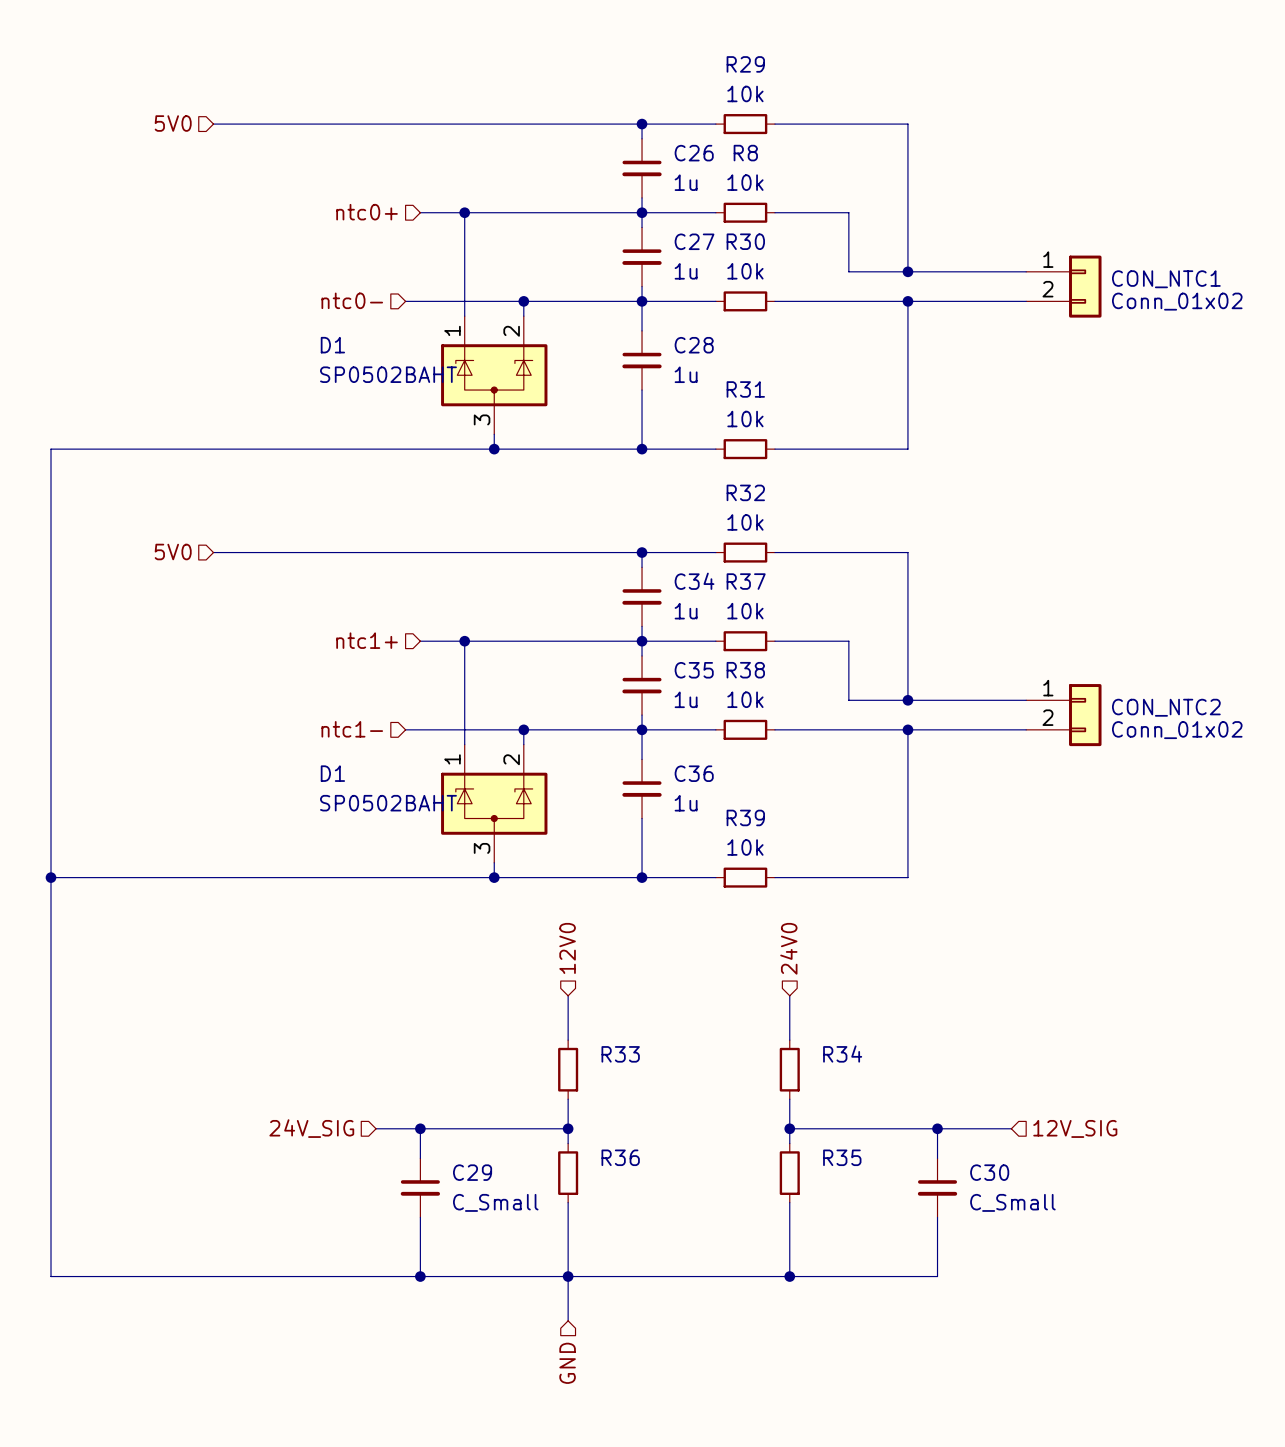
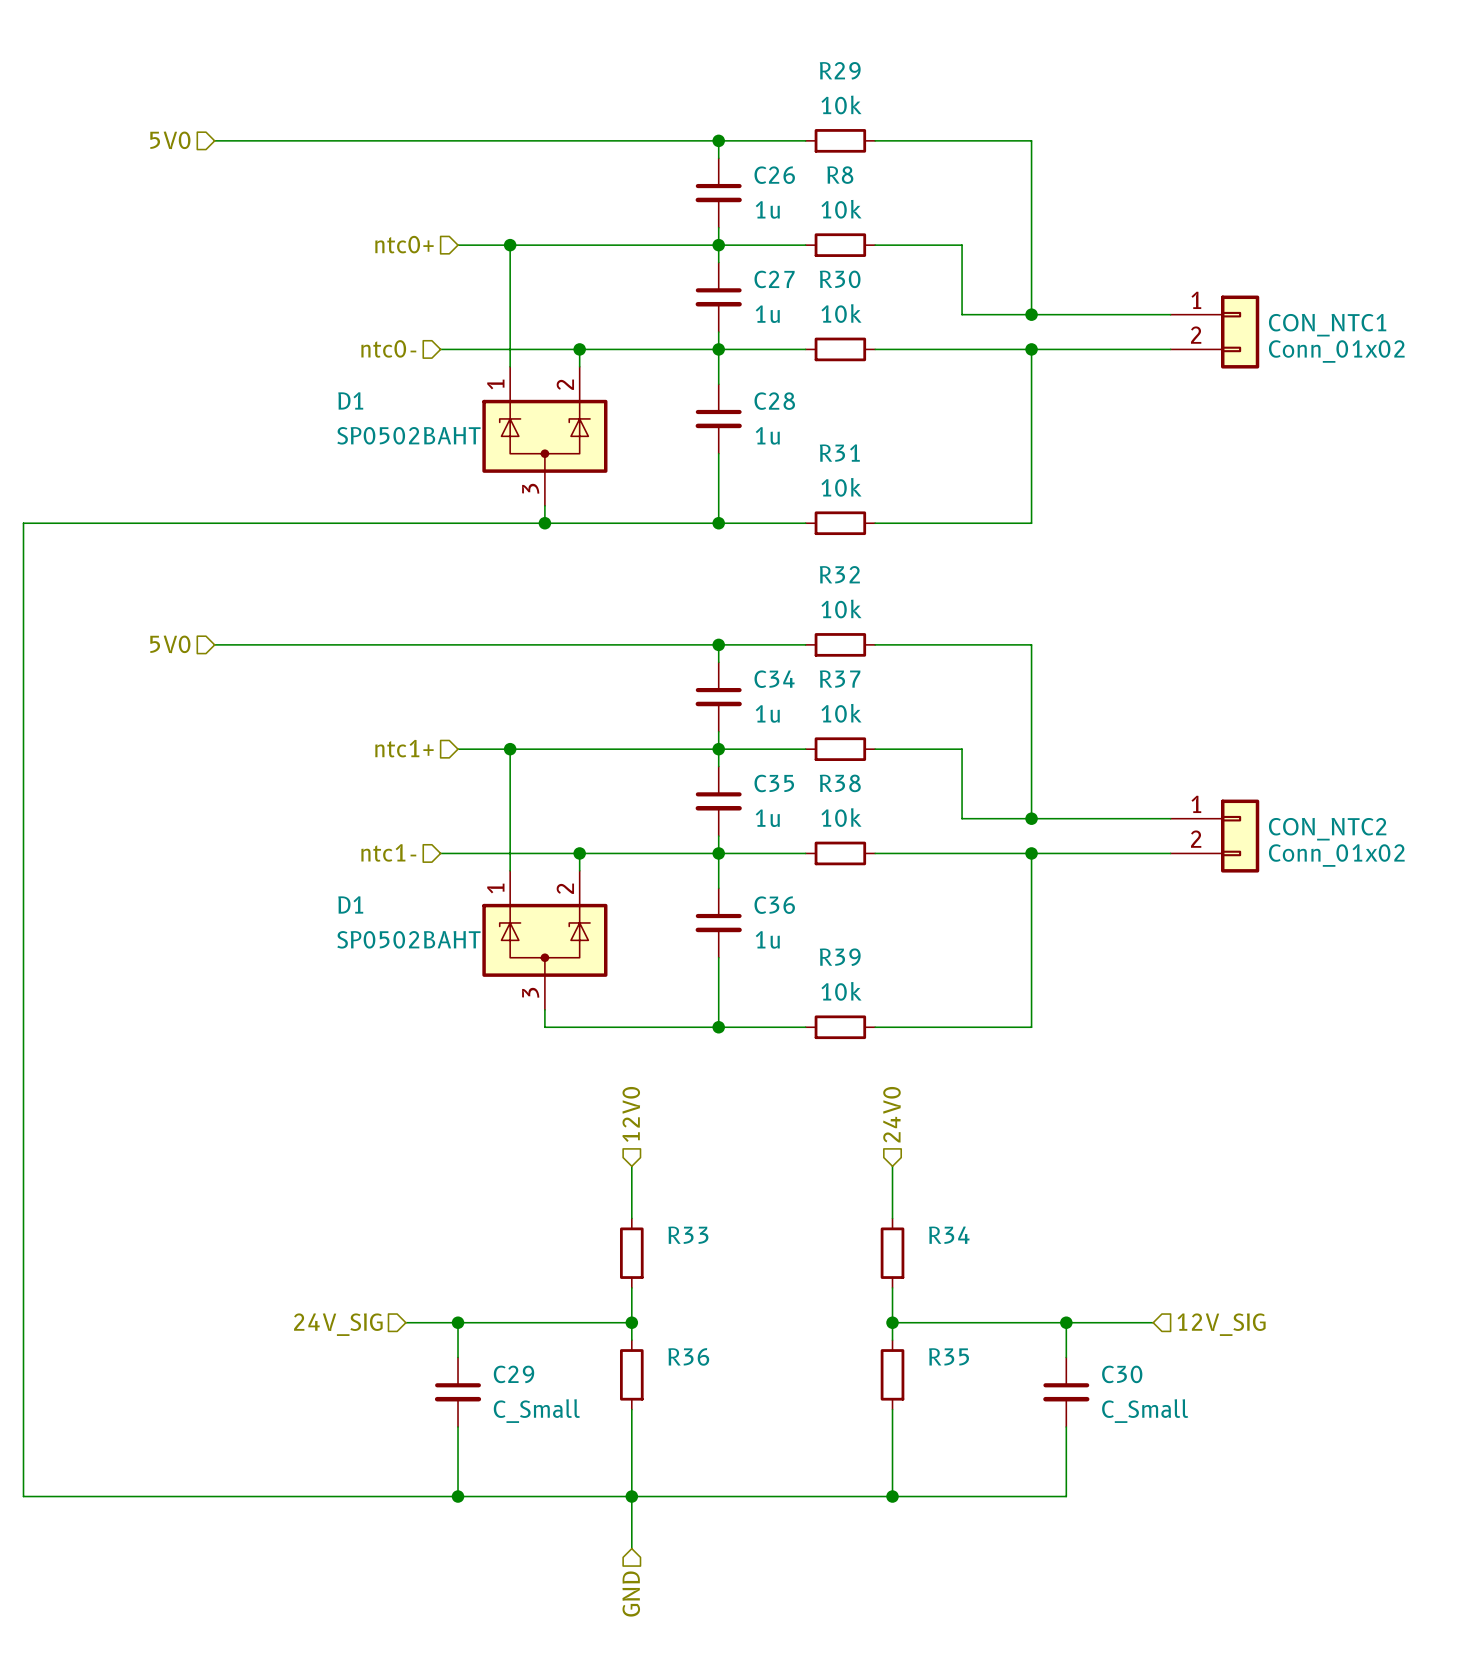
wire: (51, 877) (494, 877) -> none
junction: (51, 877) -> none
junction: (494, 877) -> none

